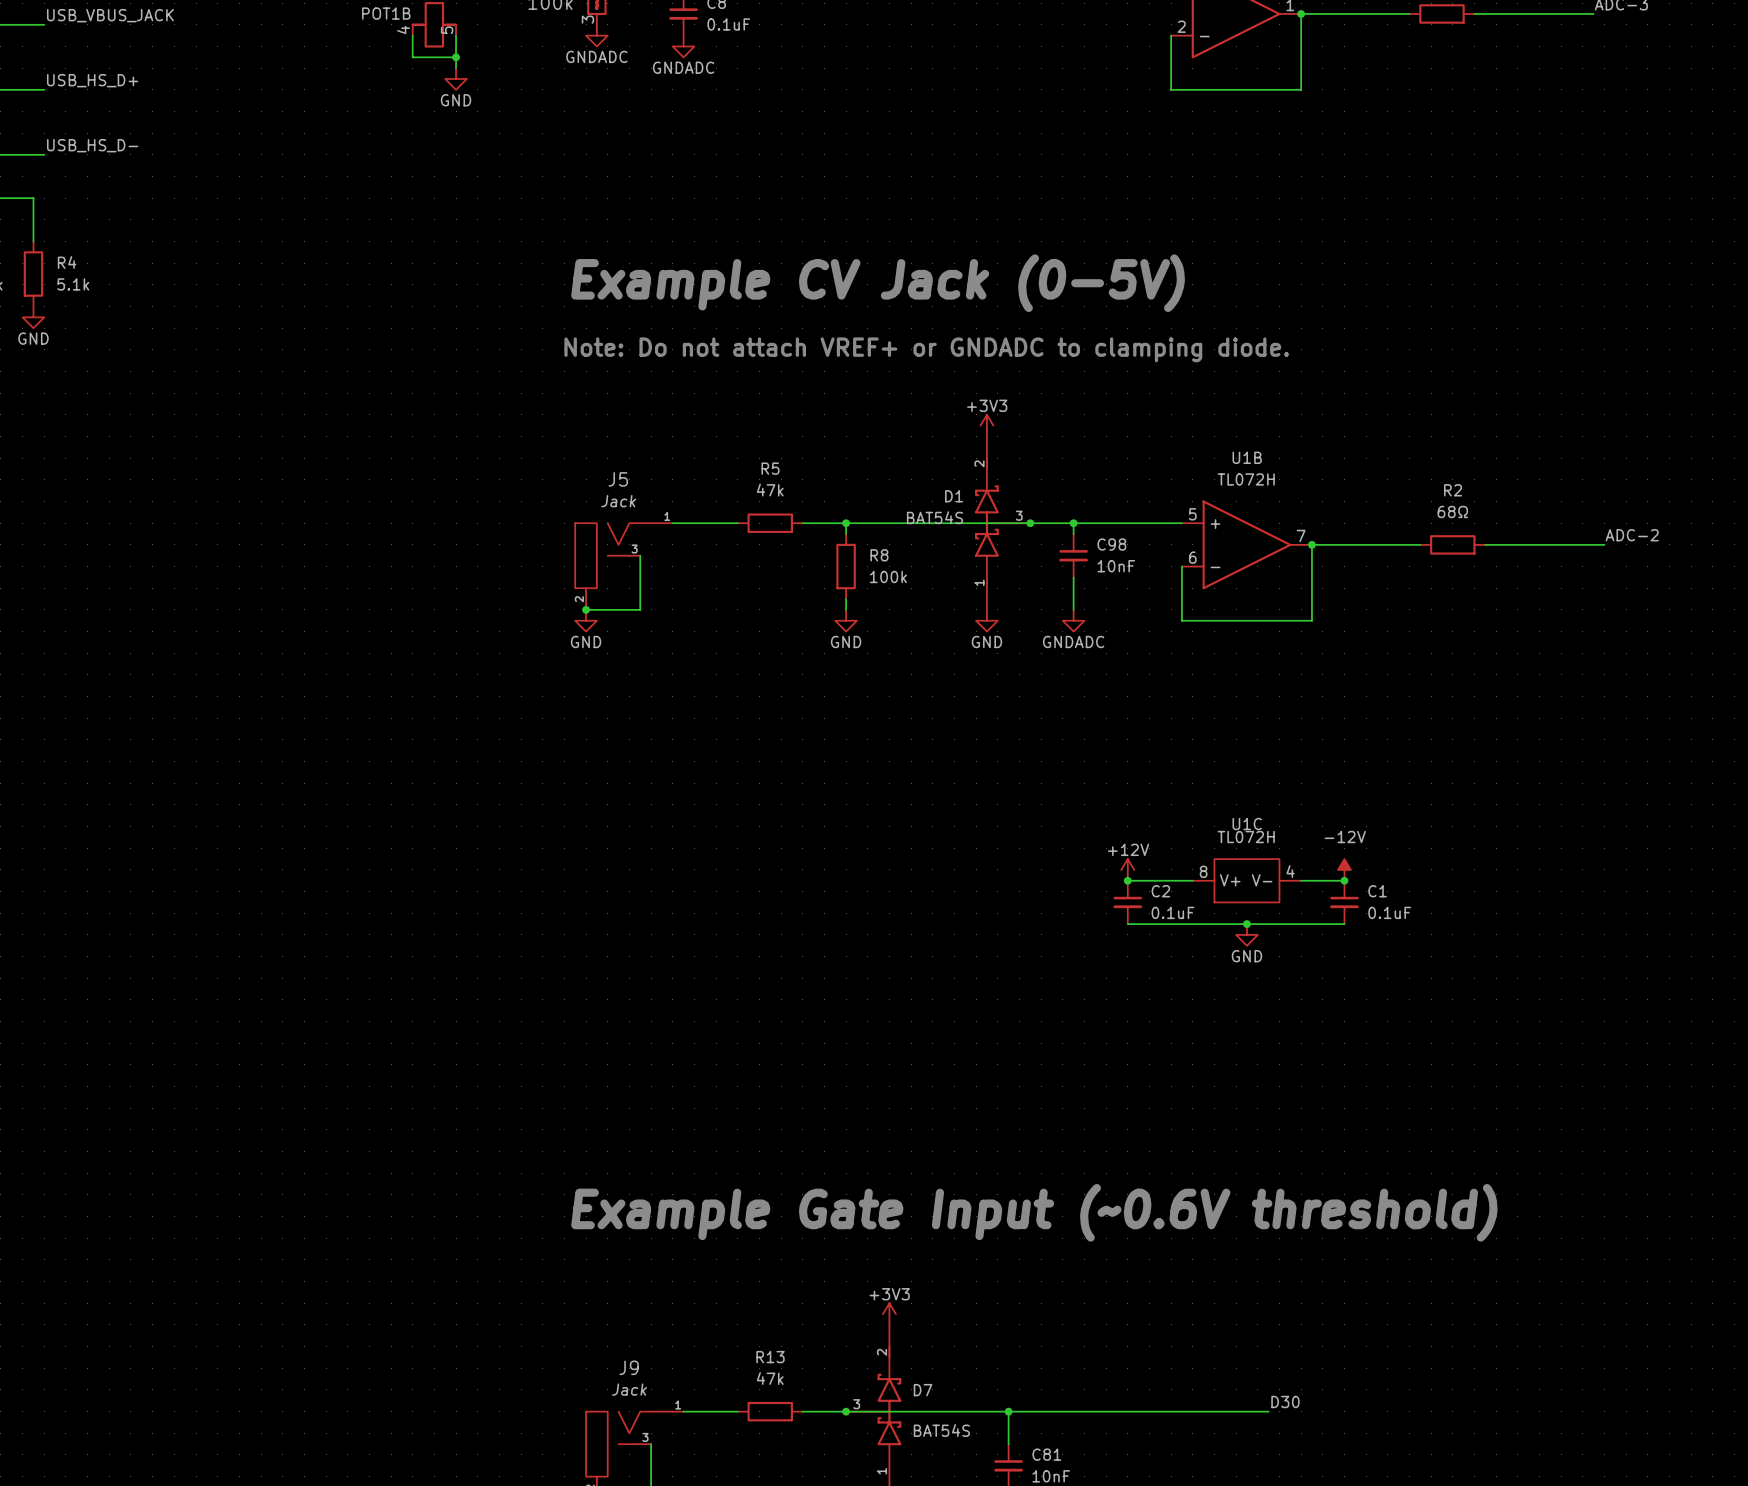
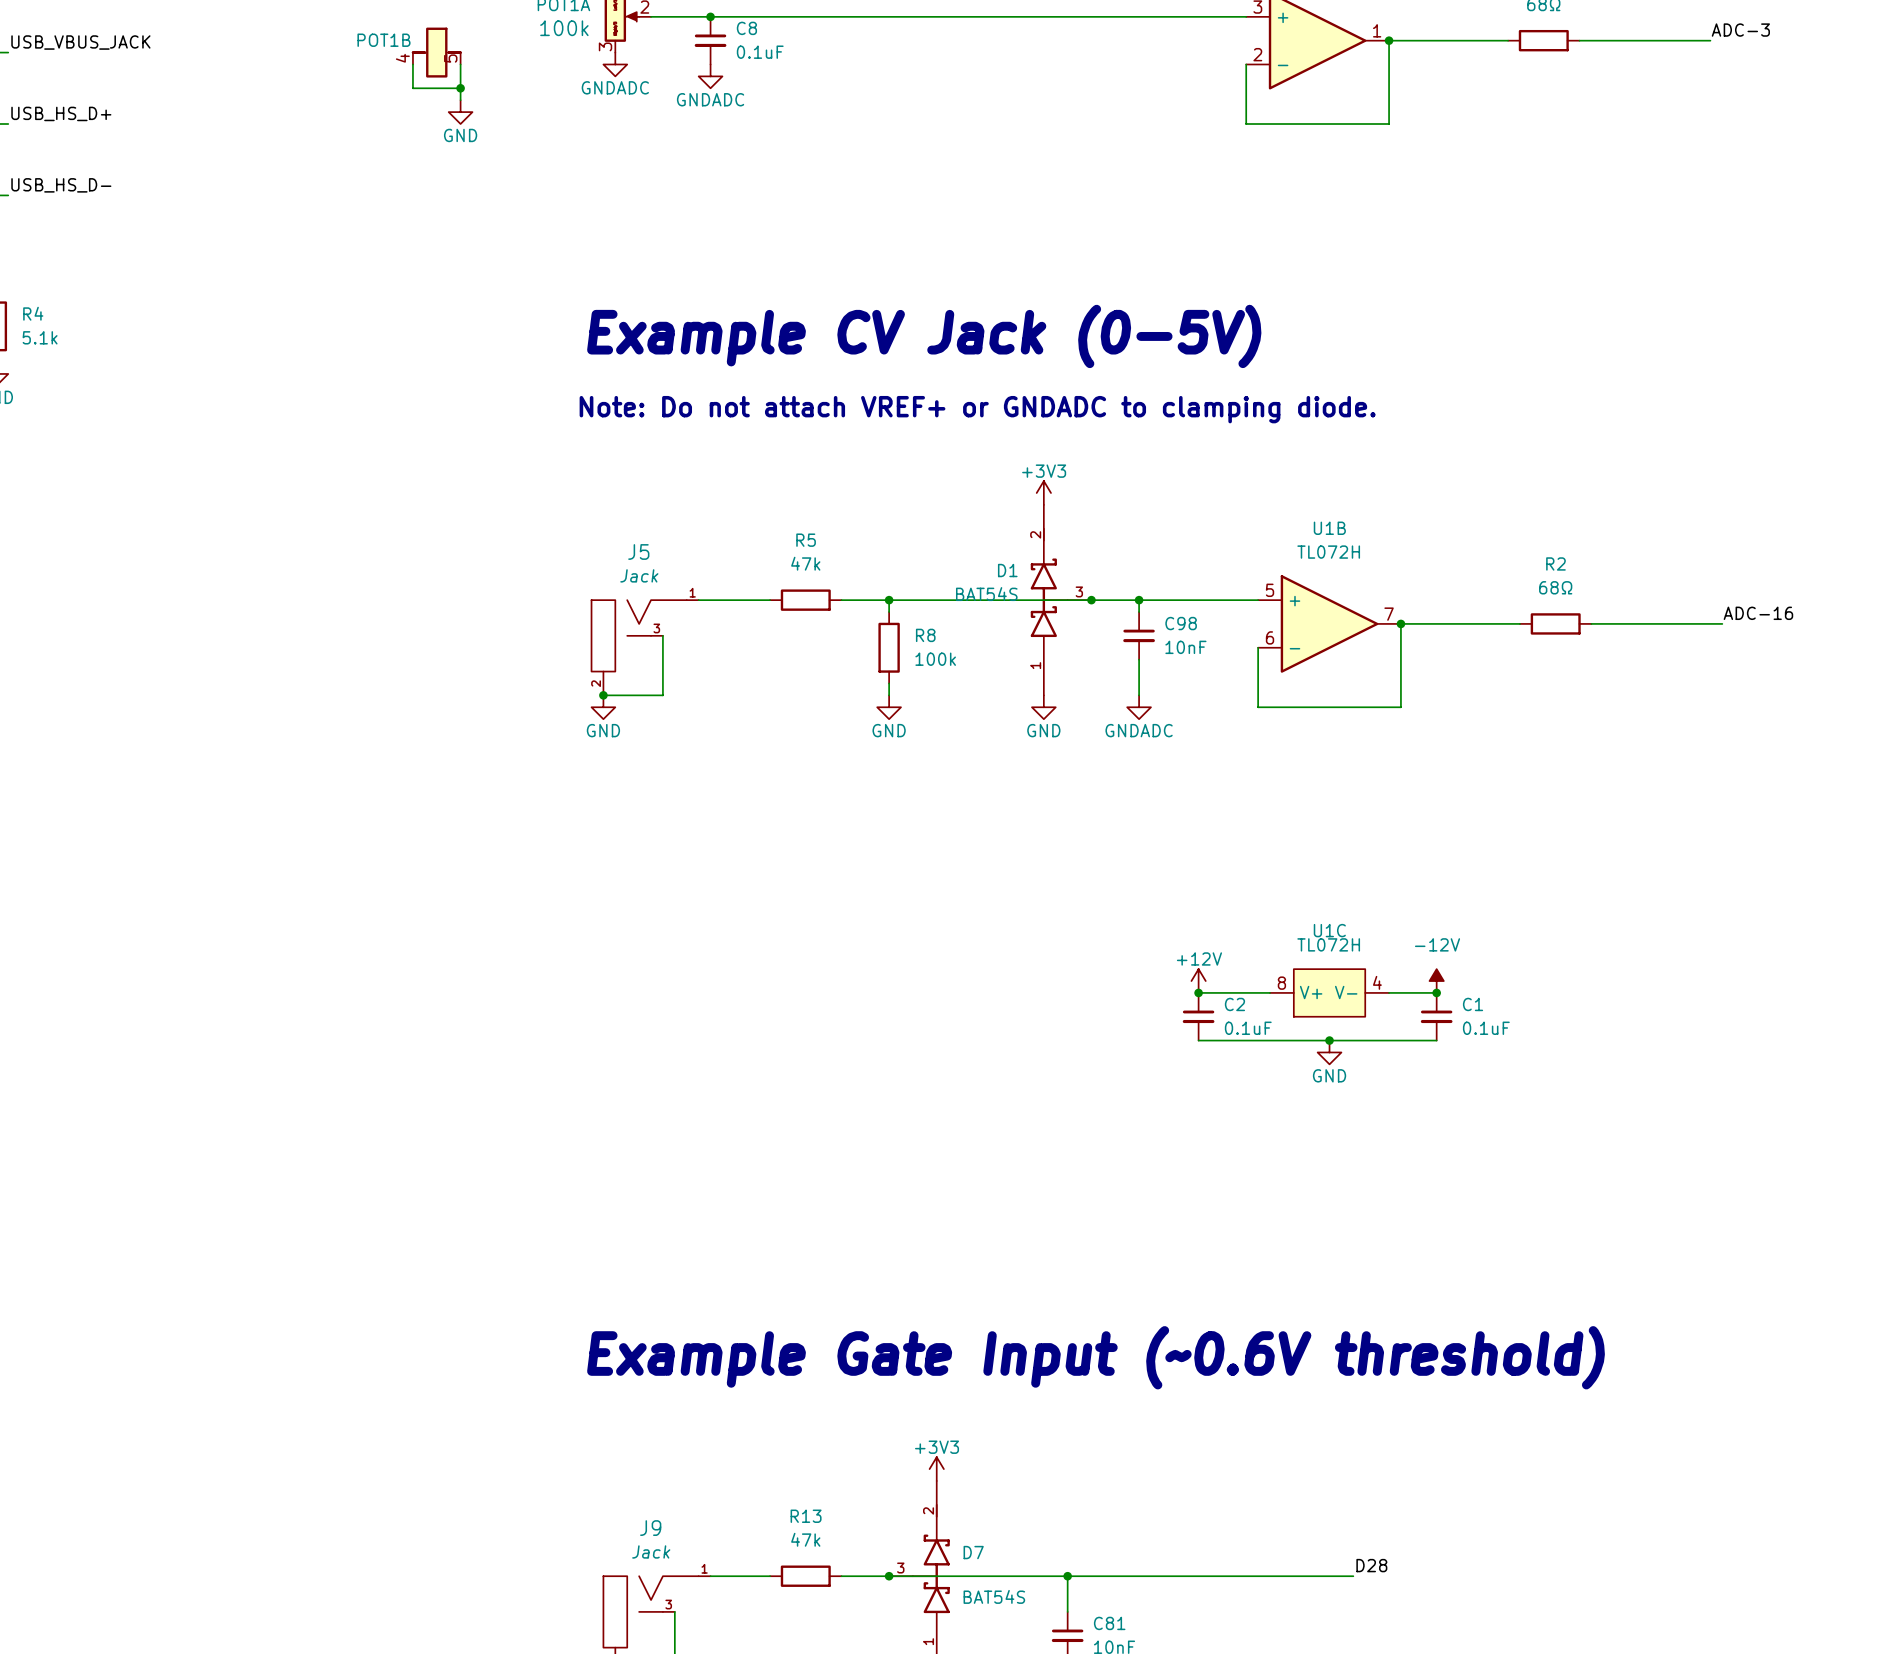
label: ADC-2 (1632, 535) -> ADC-16 (1758, 613)
label: D30 (1285, 1401) -> D28 (1371, 1565)

